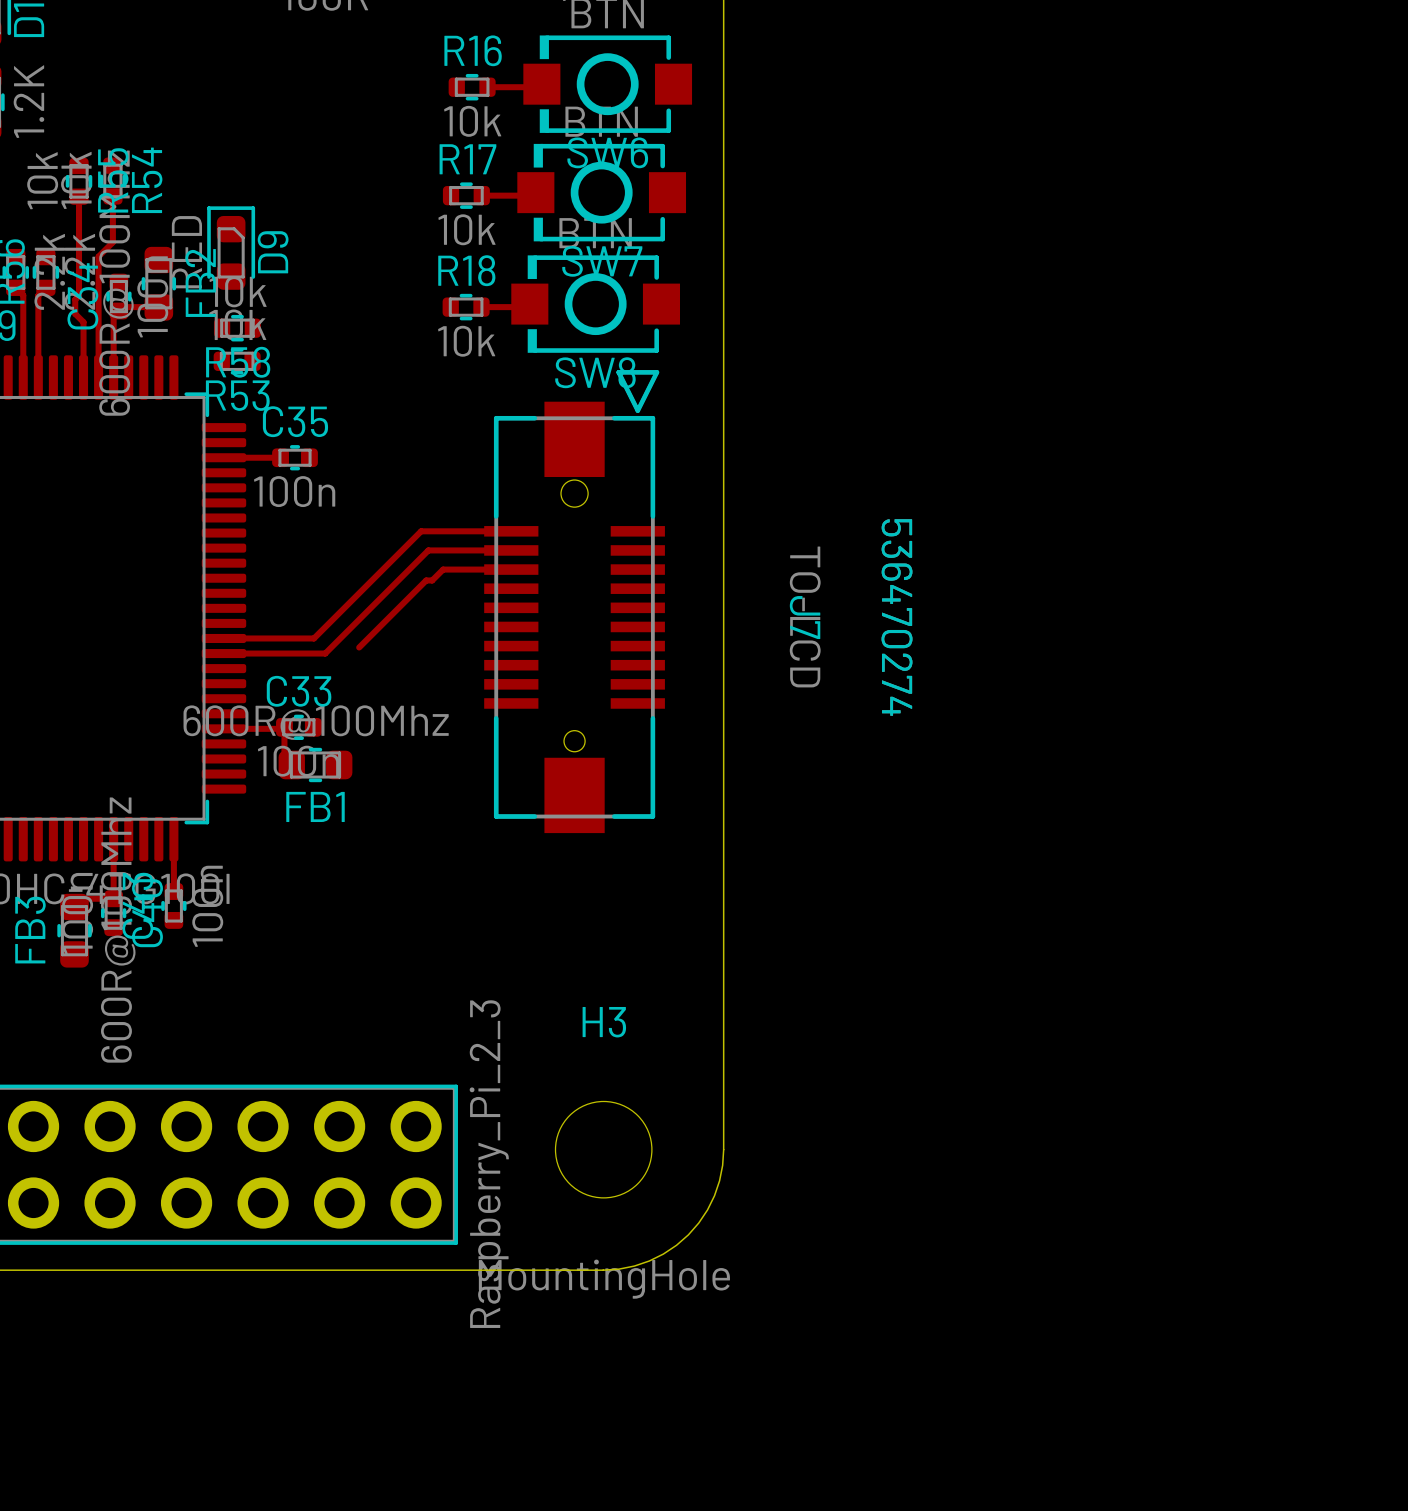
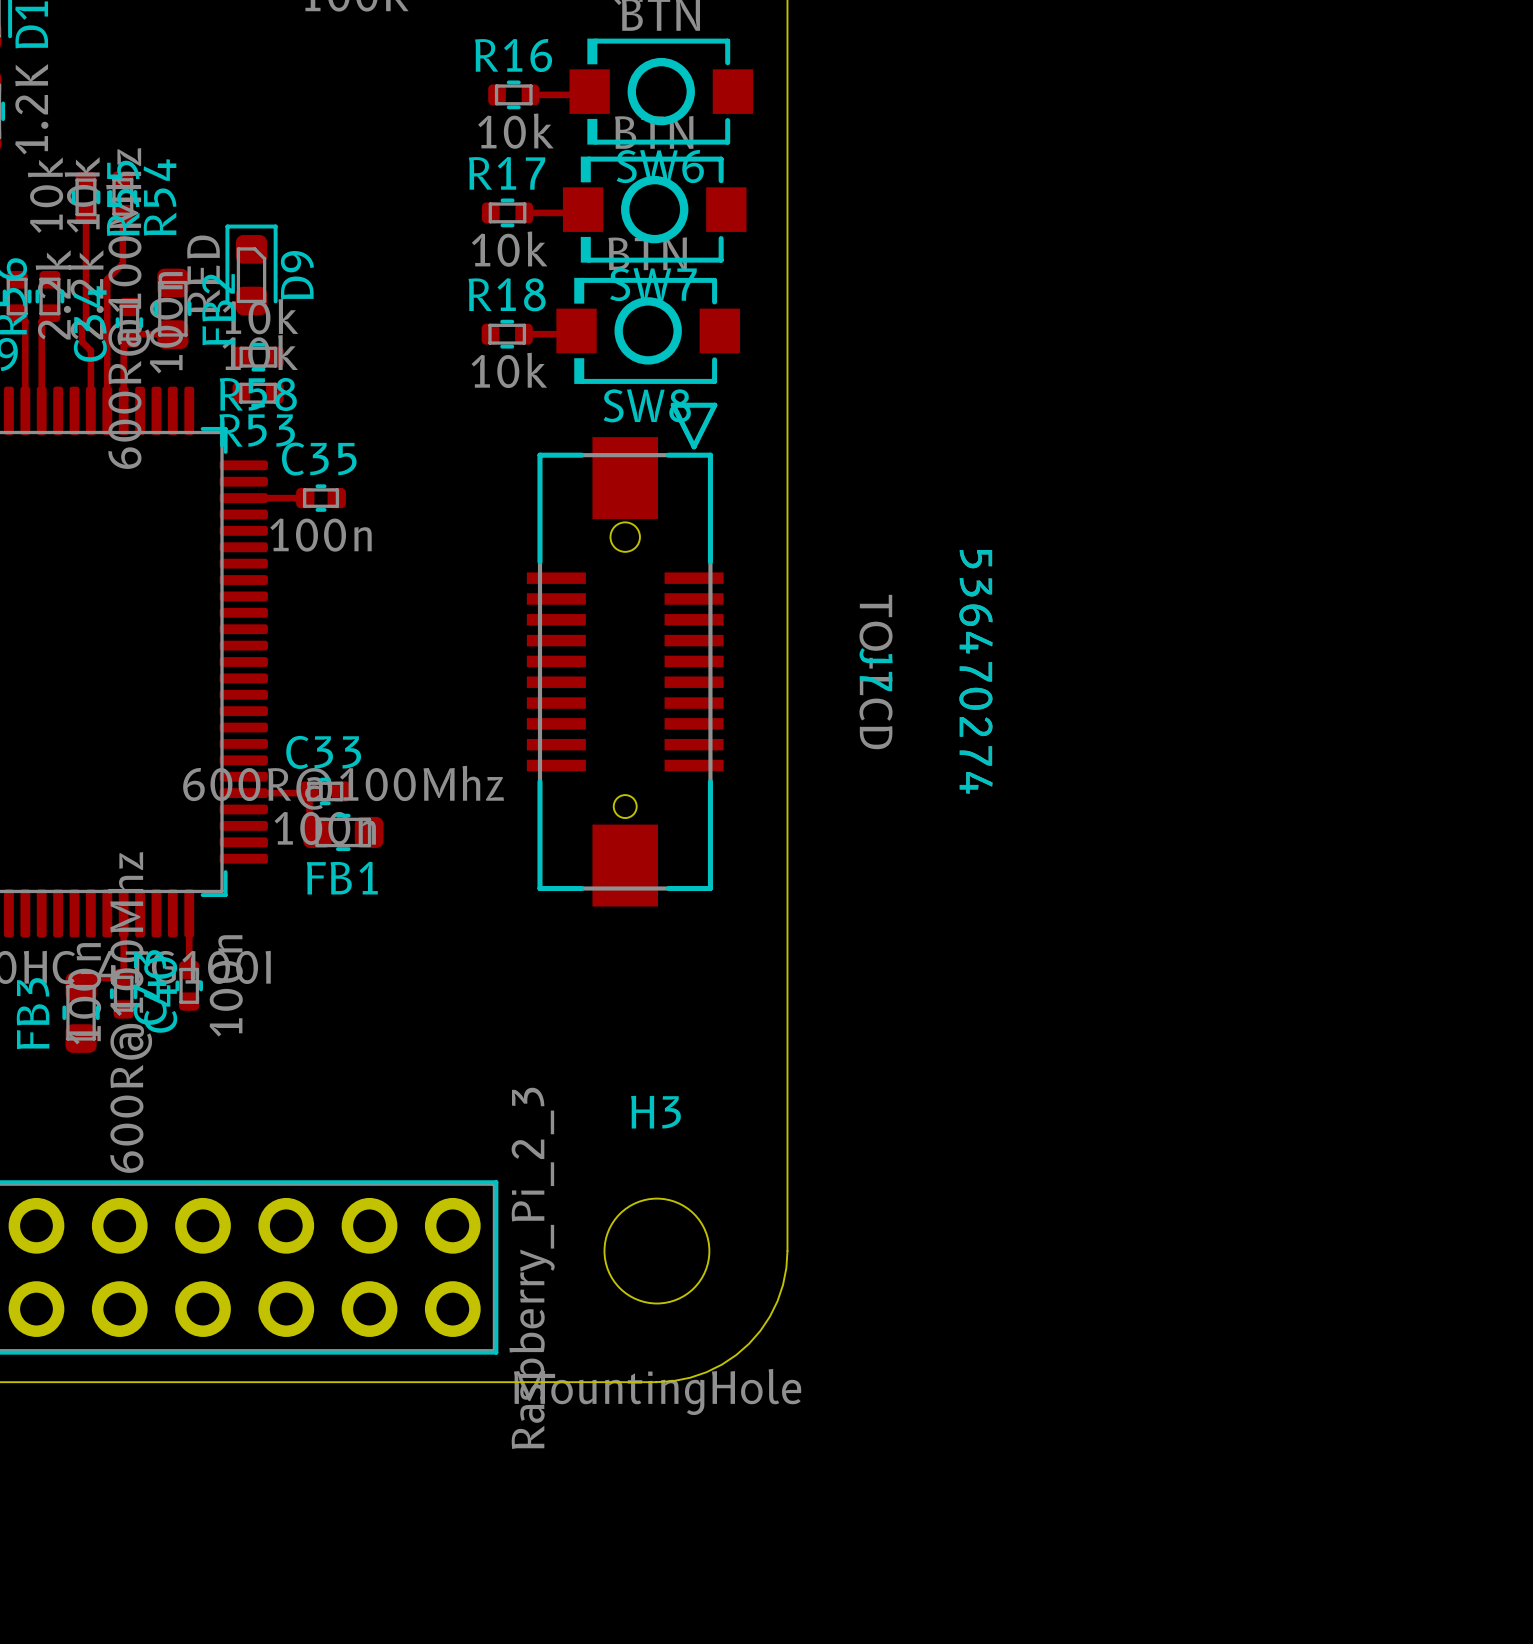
top track: (511, 531) (421, 531) (313, 638) (223, 638) -> none
top track: (511, 550) (428, 550) (325, 653) (223, 653) -> none
top track: (511, 569) (443, 569) (432, 580) (426, 580) (359, 647) -> none

